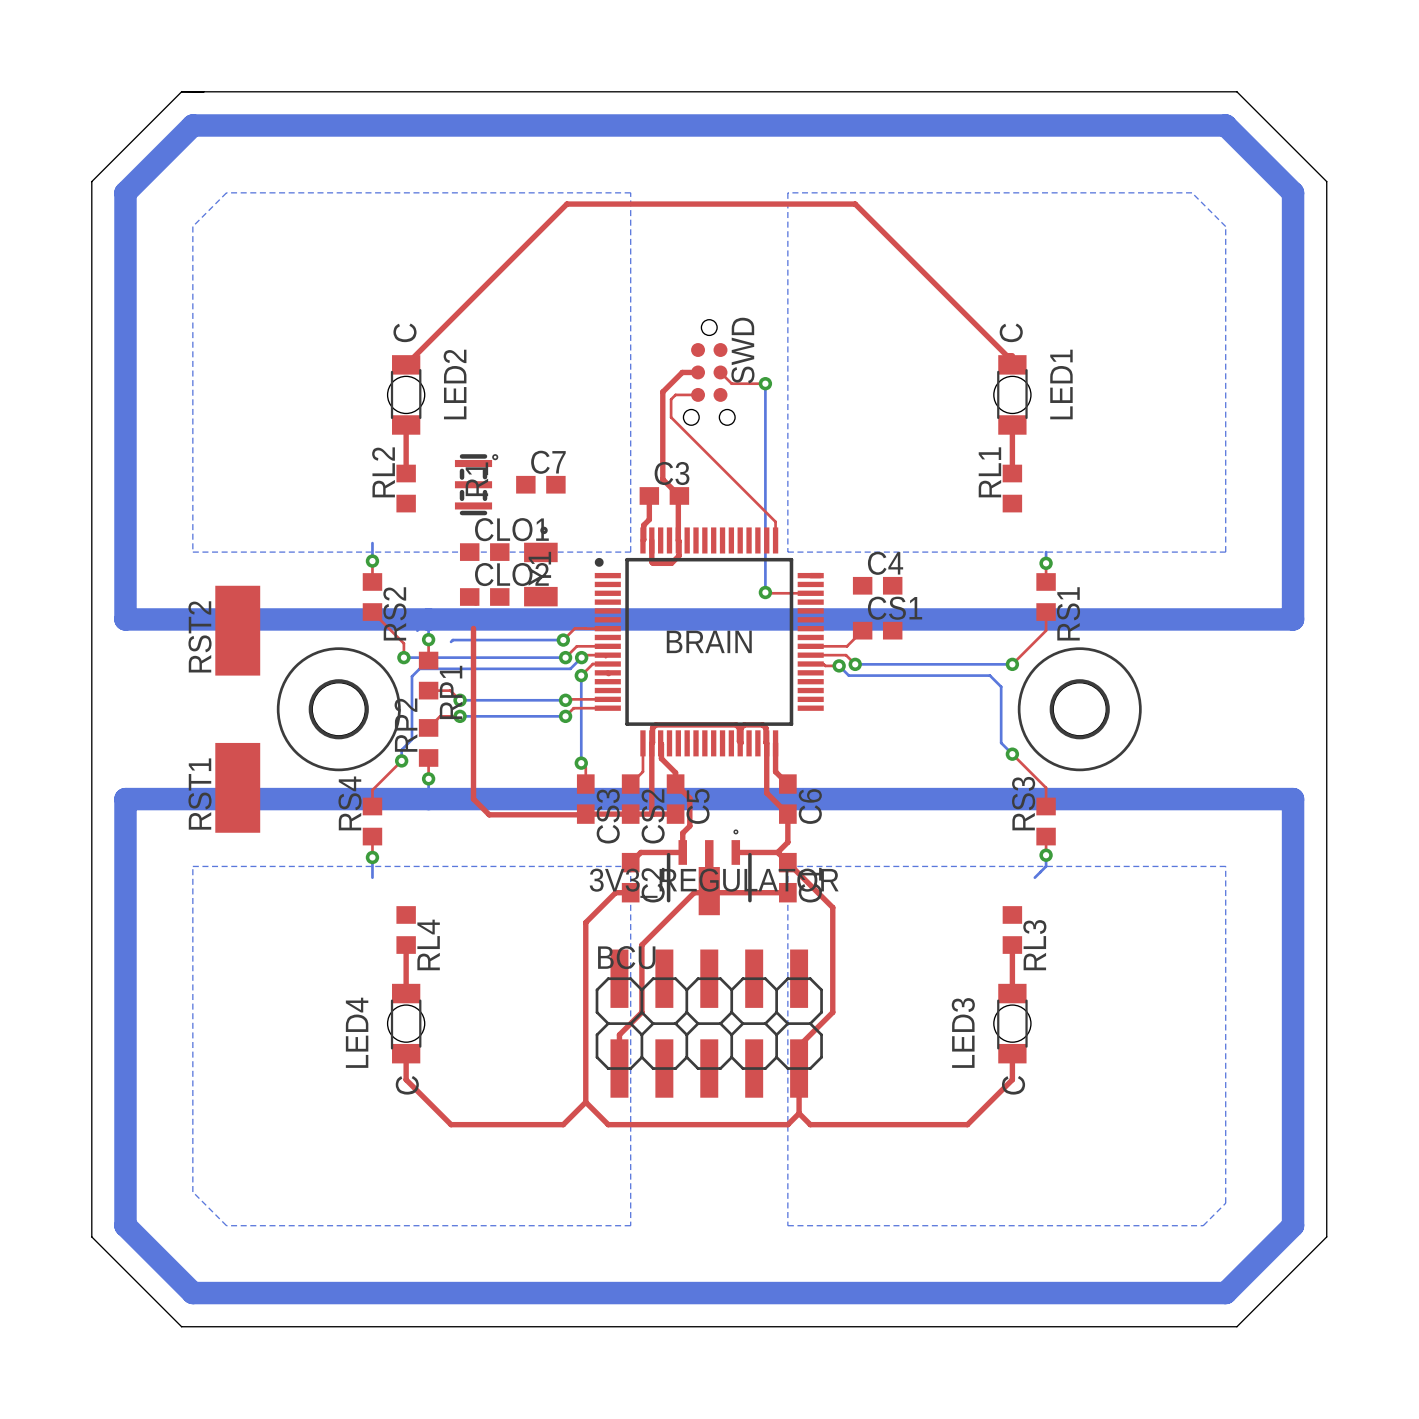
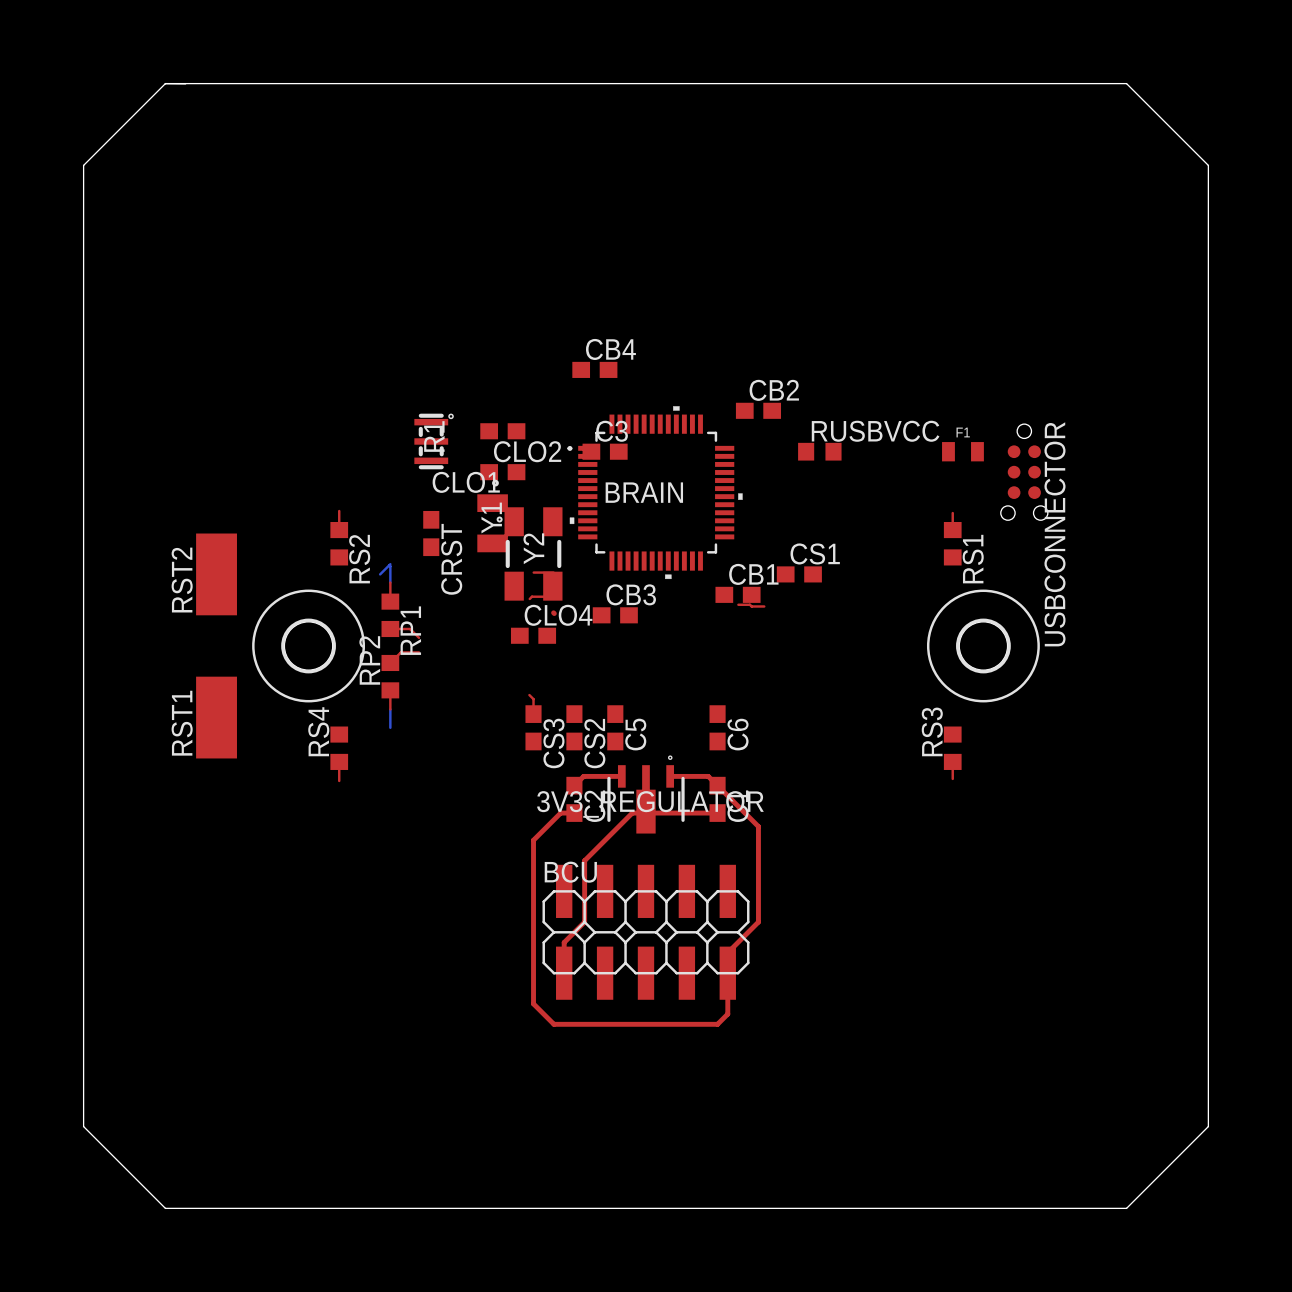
bottom track: (192, 125) (1225, 125) (1293, 192) (1293, 619) (125, 619) (125, 192) (192, 125) -> none
bottom zone outline: (226, 192) (630, 192) (630, 552) (192, 552) (192, 226) (226, 192) -> none
bottom zone outline: (787, 192) (1192, 192) (1225, 226) (1225, 552) (787, 552) (787, 192) -> none
top track: (1012, 355) (1006, 355) (855, 204) (566, 204) (406, 364) -> none
top track: (698, 372) (682, 372) (662, 392) (662, 479) (679, 495) (679, 555) (671, 563) (653, 563) (651, 540) -> none
SWD: (709, 372) -> none
top track: (720, 372) (731, 383) (765, 383) -> none
bottom track: (765, 383) (765, 592) -> none
via: (765, 383) -> none
LED2: (406, 394) -> none
top track: (698, 394) (675, 394) (671, 399) (671, 417) (775, 521) (775, 540) -> none
LED1: (1012, 394) -> none
CB4: none -> (594, 369)
top track: (406, 424) (406, 473) -> none
top track: (1012, 424) (1012, 473) -> none
CB2: none -> (758, 410)
C7: (540, 484) -> none
RL2: (406, 488) -> none
RL1: (1012, 488) -> none
top track: (649, 495) (649, 519) (643, 525) (642, 540) -> none
RUSBVCC: none -> (819, 451)
F1: none -> (962, 451)
USBCONNECTOR: none -> (1024, 472)
BRAIN: none -> (655, 492)
bottom track: (372, 543) (372, 561) -> none
CLO1 position: (484, 552) -> (502, 431)
bottom track: (1046, 552) (1046, 563) -> none
via: (372, 561) -> none
via: (1046, 563) -> none
CRST: none -> (431, 533)
C4: (877, 585) -> none
top track: (765, 592) (810, 593) -> none
via: (765, 592) -> none
CLO2 position: (484, 597) -> (502, 472)
Y2: none -> (529, 553)
top track: (372, 612) (403, 643) (403, 657) -> none
top track: (1046, 612) (1046, 630) (1012, 664) -> none
top track: (473, 628) (473, 799) (489, 814) (675, 814) -> none
top track: (585, 628) (574, 628) (563, 640) -> none
top track: (862, 630) (846, 646) (810, 646) -> none
via: (428, 639) -> none
bottom track: (563, 640) (452, 640) (451, 641) -> none
via: (563, 640) -> none
BRAIN: (709, 641) -> none
top track: (607, 646) (576, 646) (565, 657) -> none
CB1: none -> (738, 594)
top track: (810, 655) (846, 655) (855, 664) -> none
bottom track: (403, 657) (565, 657) -> none
via: (403, 657) -> none
via: (565, 657) -> none
bottom track: (581, 657) (570, 668) (419, 668) (411, 676) (411, 739) (401, 749) (401, 760) -> none
via: (581, 657) -> none
top track: (607, 664) (592, 664) (581, 675) -> none
bottom track: (855, 664) (1012, 664) -> none
via: (855, 664) -> none
via: (1012, 664) -> none
bottom track: (839, 665) (848, 675) (989, 675) (1001, 686) (1001, 742) (1012, 754) -> none
via: (839, 665) -> none
bottom track: (581, 675) (581, 763) -> none
via: (581, 675) -> none
CB3: none -> (615, 615)
CLO4: none -> (533, 635)
top track: (607, 699) (565, 700) -> none
bottom track: (460, 700) (565, 700) -> none
via: (460, 700) -> none
via: (565, 700) -> none
top track: (608, 708) (573, 708) (565, 716) -> none
bottom track: (460, 716) (565, 716) -> none
via: (460, 716) -> none
via: (565, 716) -> none
top track: (642, 743) (642, 771) (630, 784) -> none
top track: (660, 743) (661, 758) (675, 772) (675, 784) (689, 798) (689, 826) (682, 833) (682, 852) -> none
top track: (775, 743) (775, 771) (787, 784) -> none
top track: (1012, 754) (1046, 787) (1046, 806) -> none
via: (1012, 754) -> none
top track: (401, 760) (372, 790) (372, 806) -> none
via: (401, 760) -> none
via: (581, 763) -> none
via: (428, 778) -> none
bottom track: (125, 799) (125, 1225) (192, 1293) (1225, 1293) (1293, 1225) (1293, 799) (125, 799) -> none
top track: (653, 814) (651, 743) (652, 728) (655, 724) (736, 724) (739, 728) (741, 742) (741, 728) (744, 724) (762, 724) (765, 728) (766, 792) (787, 814) (787, 842) (777, 852) -> none
bottom track: (1046, 855) (1046, 866) (1034, 877) -> none
via: (1046, 855) -> none
bottom track: (372, 857) (372, 877) -> none
via: (372, 857) -> none
bottom zone outline: (192, 866) (192, 1192) (226, 1225) (630, 1225) (630, 866) (192, 866) -> none
bottom zone outline: (787, 866) (787, 1225) (1203, 1225) (1225, 1203) (1225, 866) (787, 866) -> none
RL4: (406, 930) -> none
RL3: (1012, 930) -> none
top track: (406, 945) (406, 993) -> none
top track: (1012, 945) (1012, 984) -> none
LED4: (406, 1023) -> none
LED3: (1012, 1023) -> none
top track: (406, 1062) (406, 1079) (451, 1124) (563, 1124) (585, 1102) -> none
top track: (1012, 1062) (1012, 1079) (967, 1124) (810, 1124) (799, 1113) -> none

